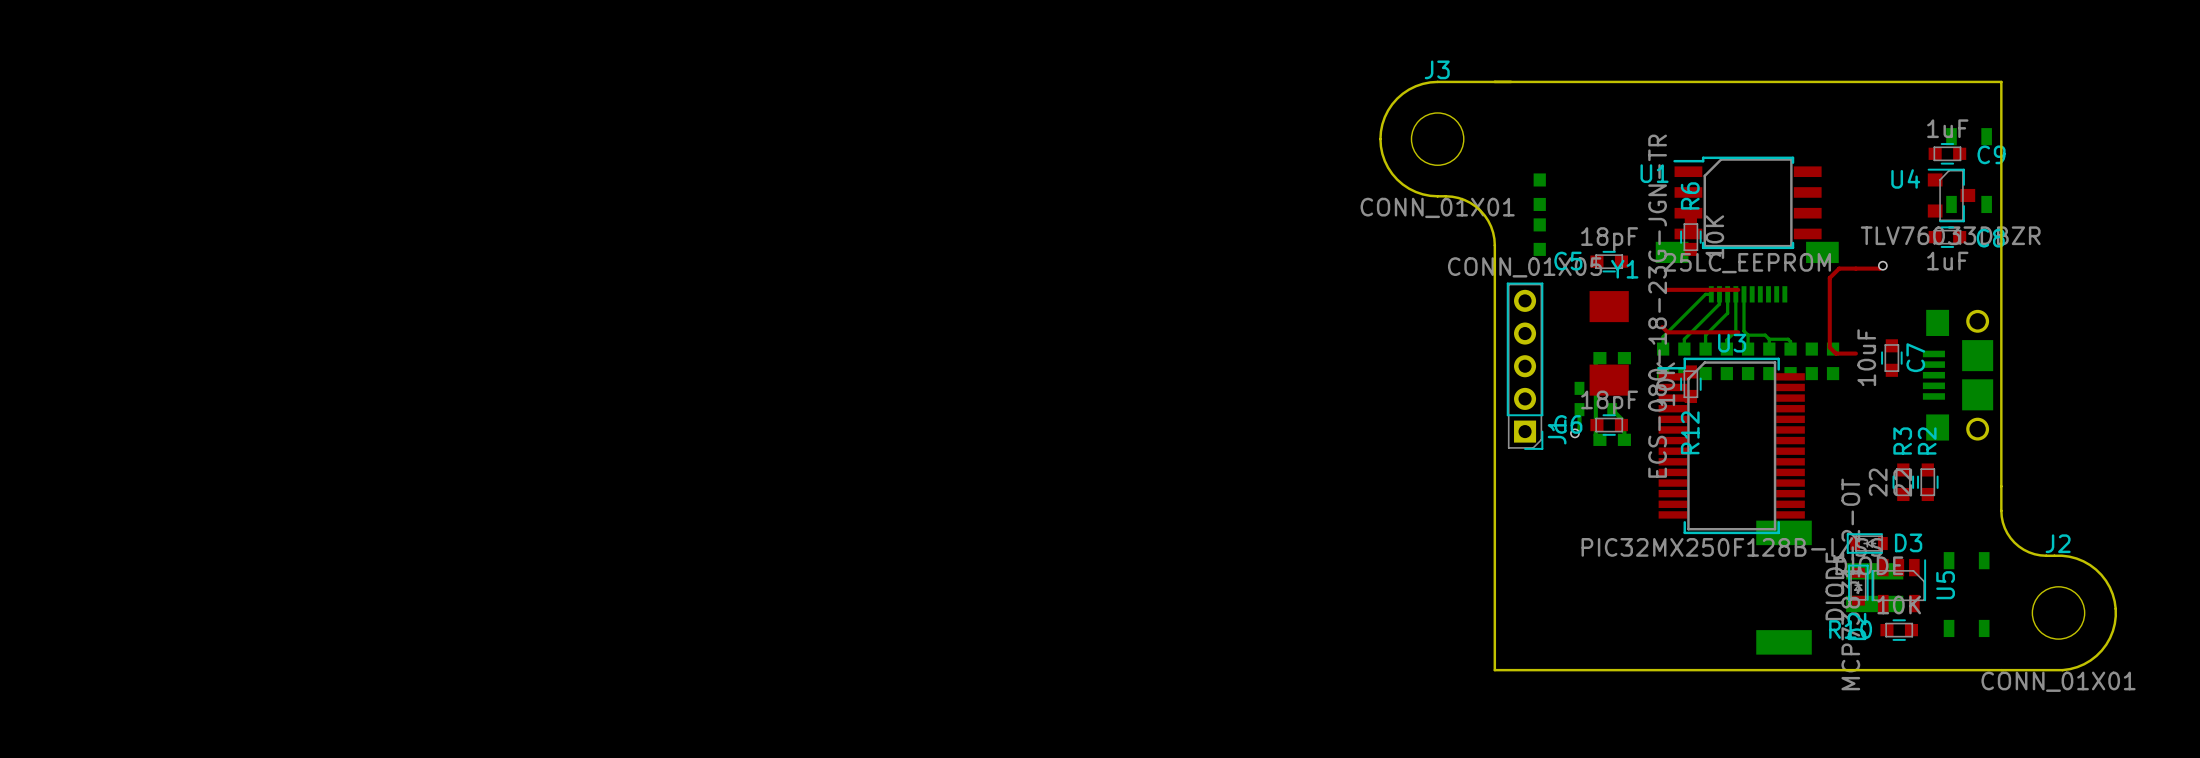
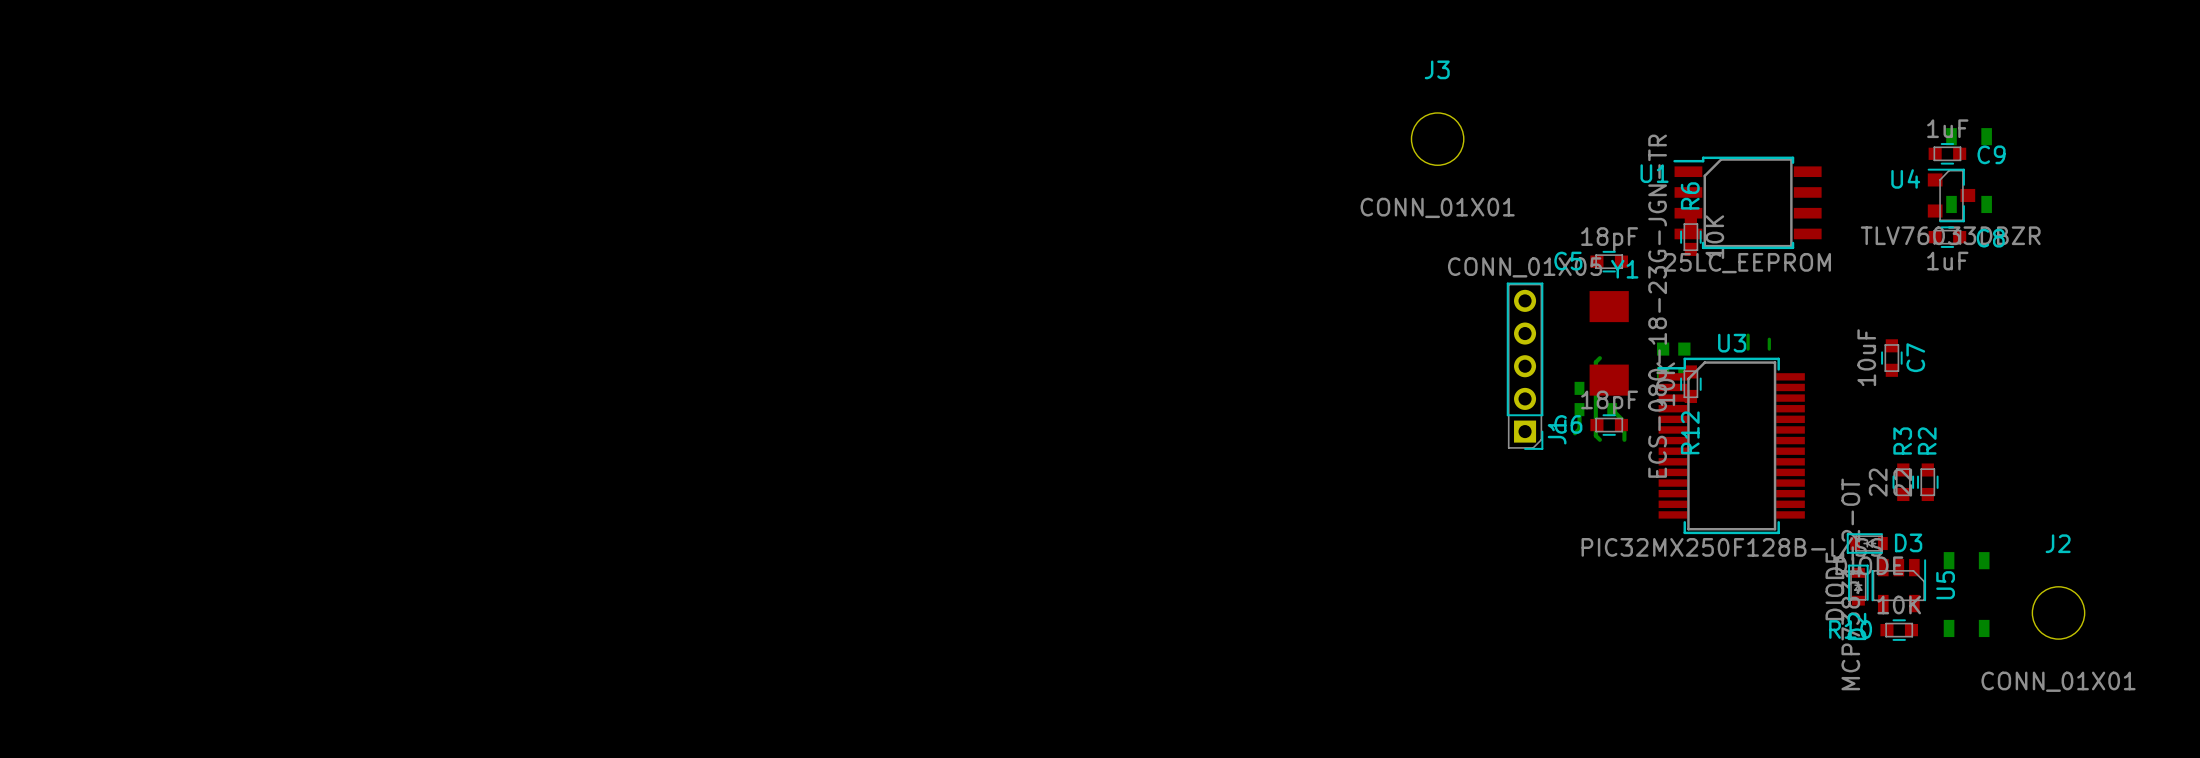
board edge: (1437, 81) (2001, 81) (2001, 516) (2004, 528) (2010, 538) (2023, 549) (2040, 555) (2061, 555) (2076, 558) (2090, 565) (2106, 580) (2112, 594) (2115, 616) (2112, 631) (2101, 650) (2084, 664) (2062, 670) (1494, 670) (1494, 245) (1493, 232) (1484, 215) (1470, 202) (1452, 196) (1422, 194) (1402, 184) (1388, 167) (1380, 146) (1382, 124) (1388, 110) (1397, 98) (1415, 86) (1437, 81) -> none
part: (1539, 192) -> none
part: (1539, 237) -> none
top track: (1882, 265) (1880, 268) (1839, 268) (1829, 278) (1829, 347) (1835, 353) (1855, 353) -> none
via: (1882, 265) -> none
part: (1747, 272) -> none
top track: (1738, 289) (1666, 290) -> none
bottom track: (1711, 294) (1705, 294) (1663, 336) (1663, 349) -> none
bottom track: (1719, 294) (1719, 304) (1684, 339) (1684, 349) -> none
bottom track: (1727, 294) (1727, 313) (1705, 335) (1705, 349) -> none
bottom track: (1735, 294) (1735, 331) (1726, 340) (1726, 349) -> none
bottom track: (1743, 294) (1743, 331) (1748, 335) (1765, 335) (1769, 339) (1788, 339) (1790, 341) (1790, 349) -> none
top track: (1662, 327) (1667, 332) (1738, 332) -> none
part: (1612, 358) -> none
part: (1705, 361) -> none
part: (1726, 361) -> none
part: (1748, 361) -> none
part: (1769, 361) -> none
part: (1790, 361) -> none
part: (1811, 361) -> none
part: (1833, 361) -> none
part: (1958, 375) -> none
via: (1574, 433) -> none
part: (1612, 439) -> none
part: (1829, 587) -> none

